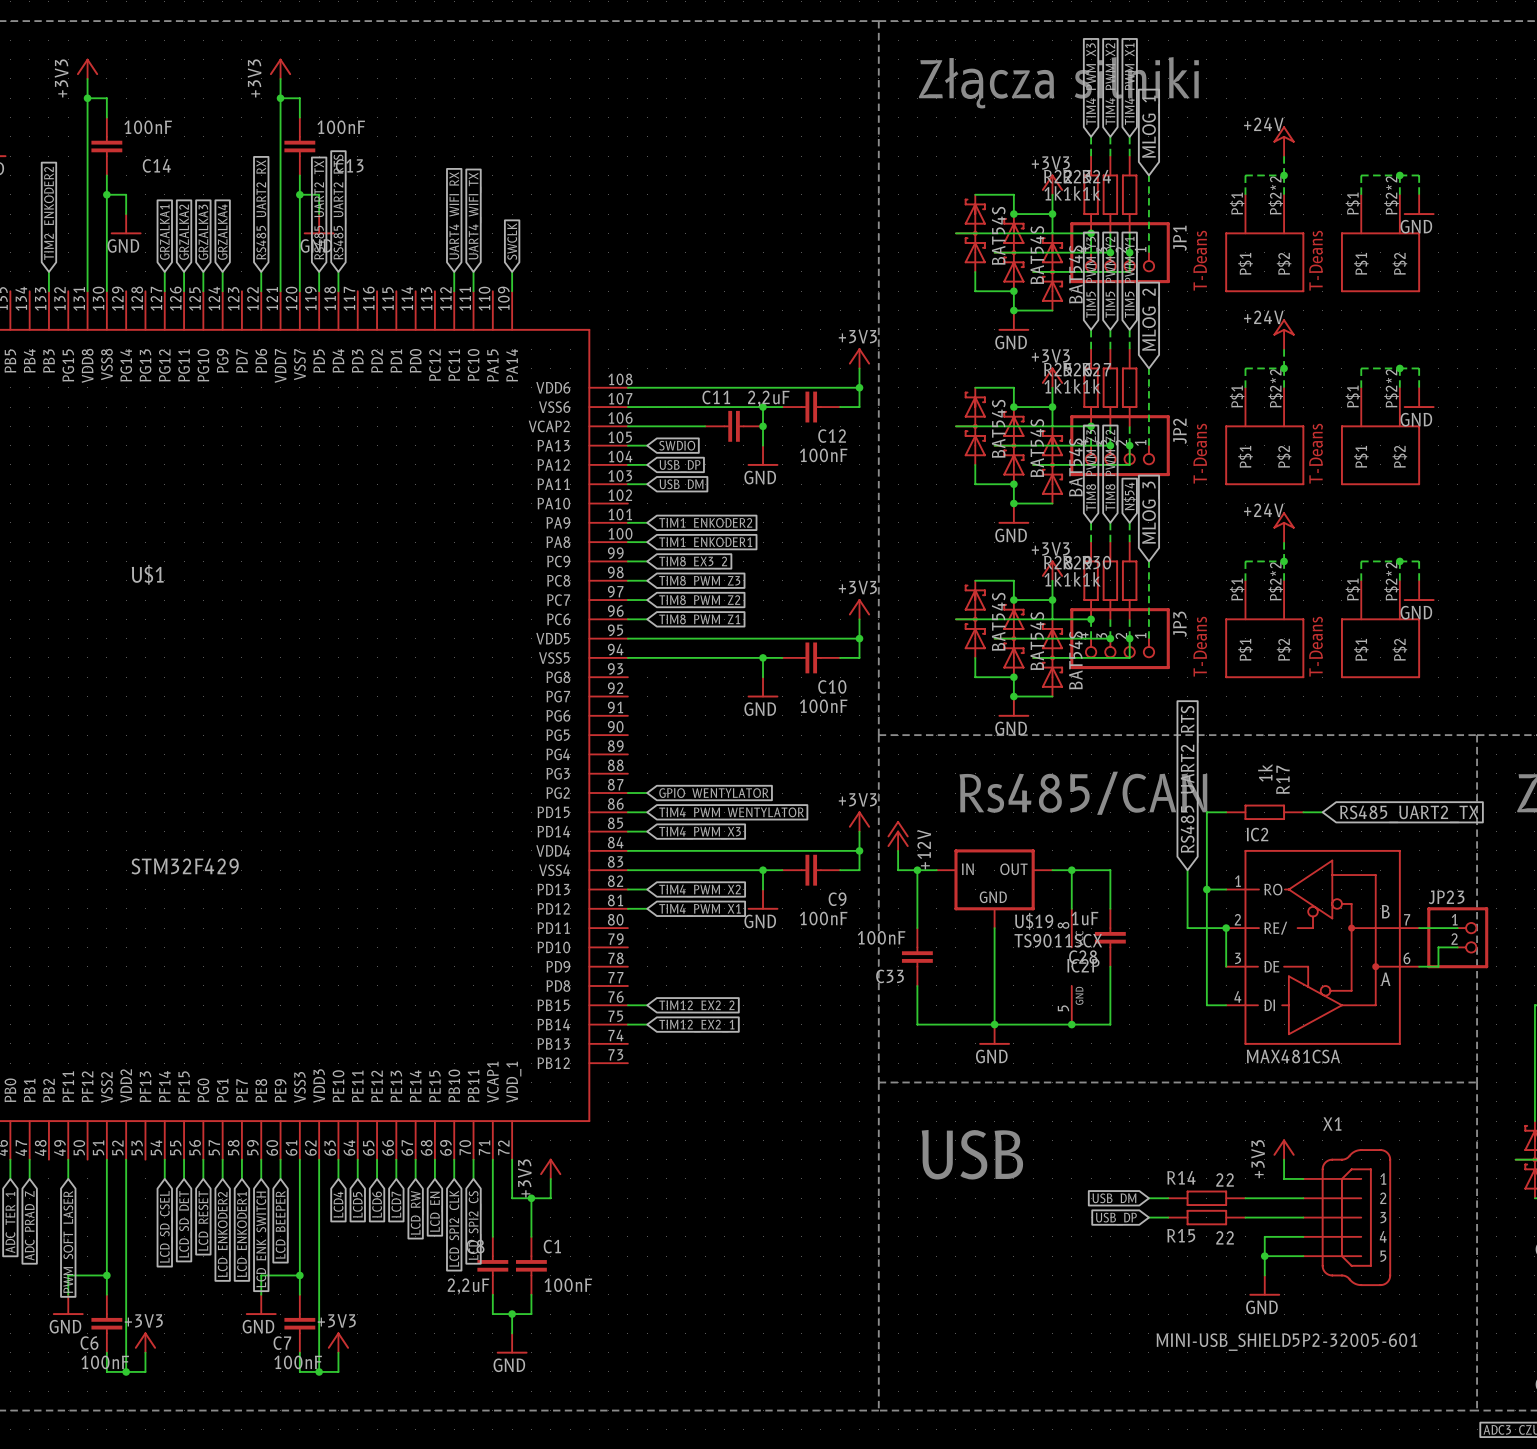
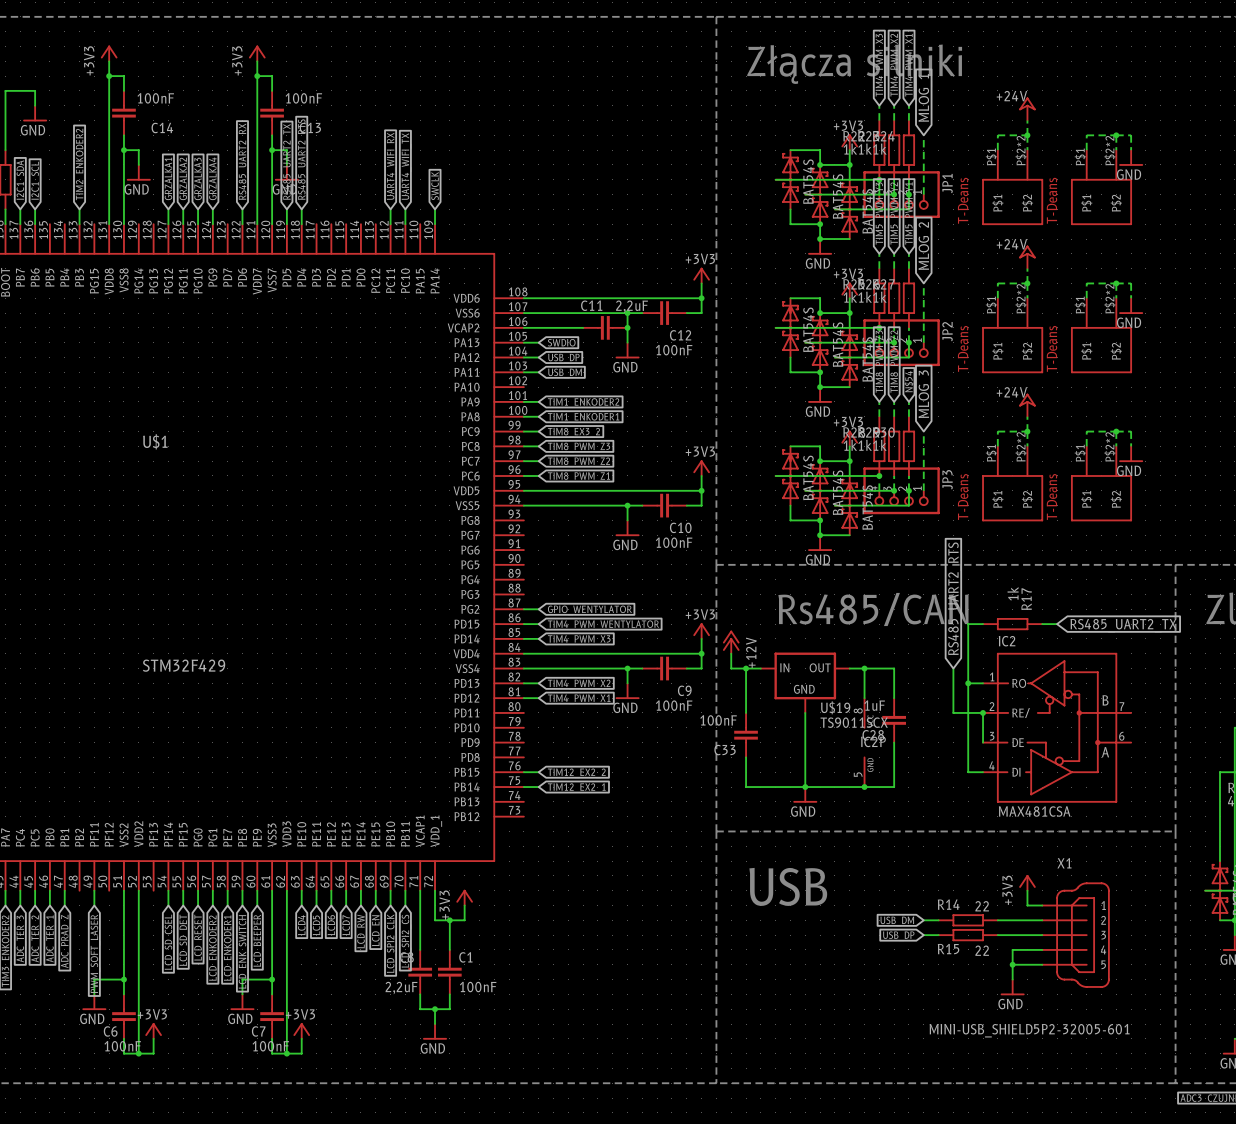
wire: (1419, 928) (1457, 928) -> none
JP23: (1457, 937) -> none
wire: (1457, 947) (1438, 947) (1438, 966) (1419, 966) -> none

